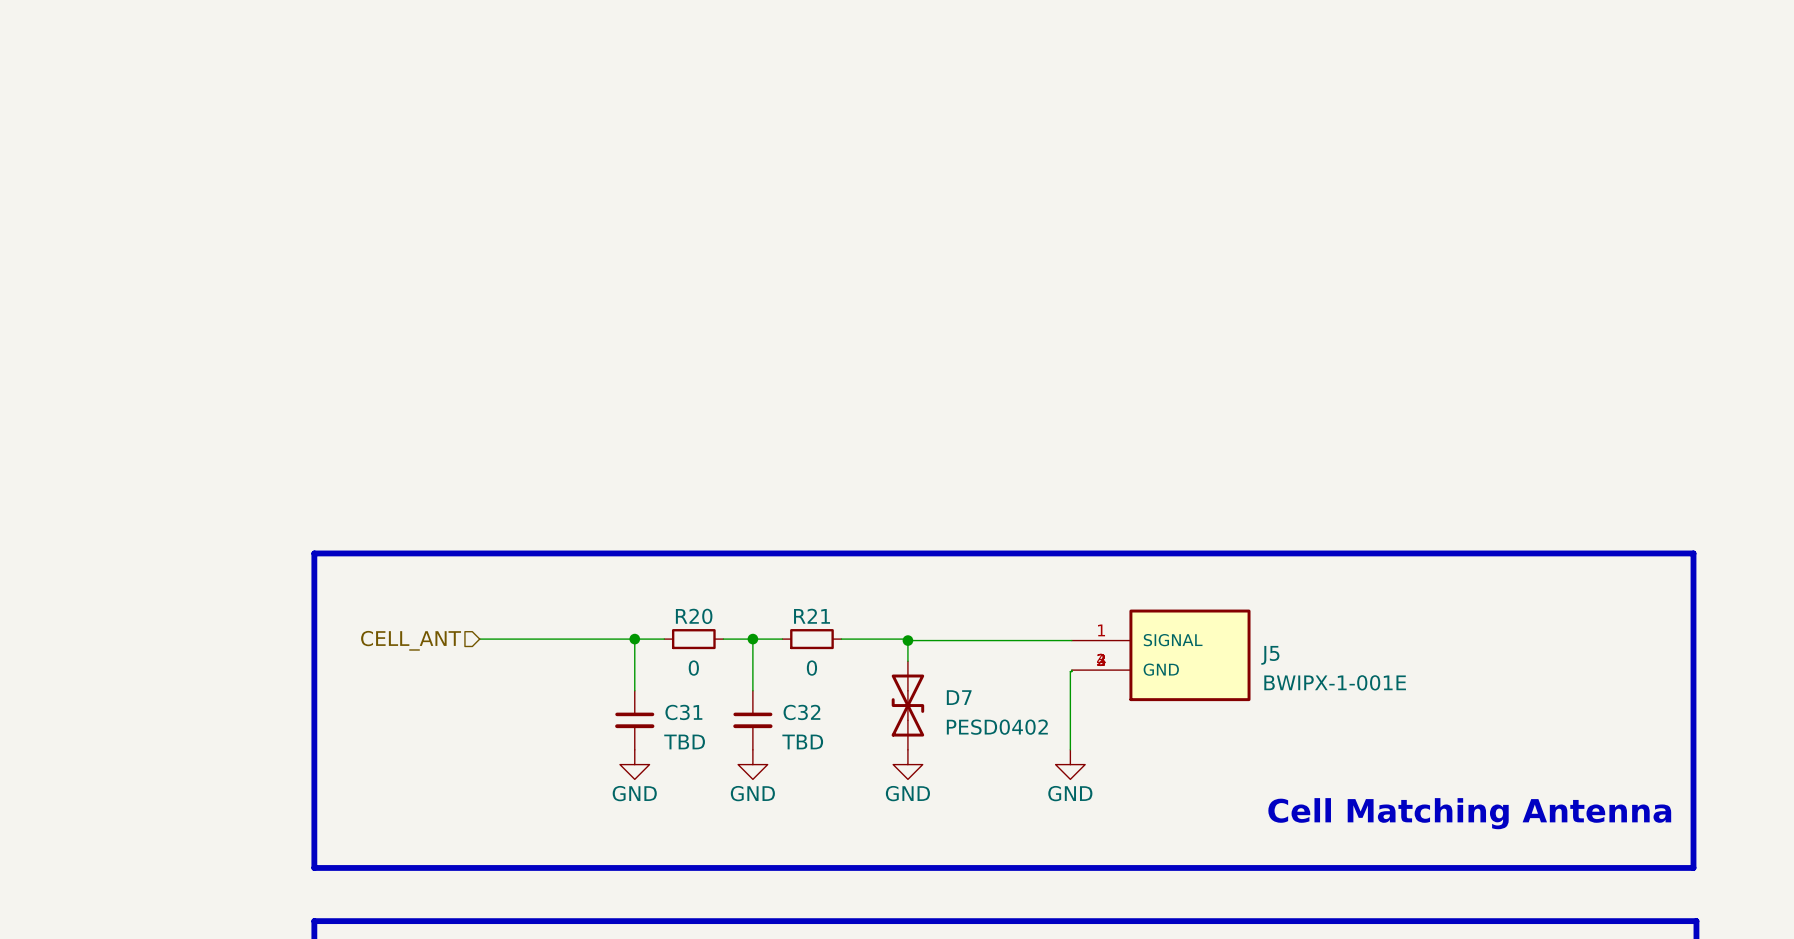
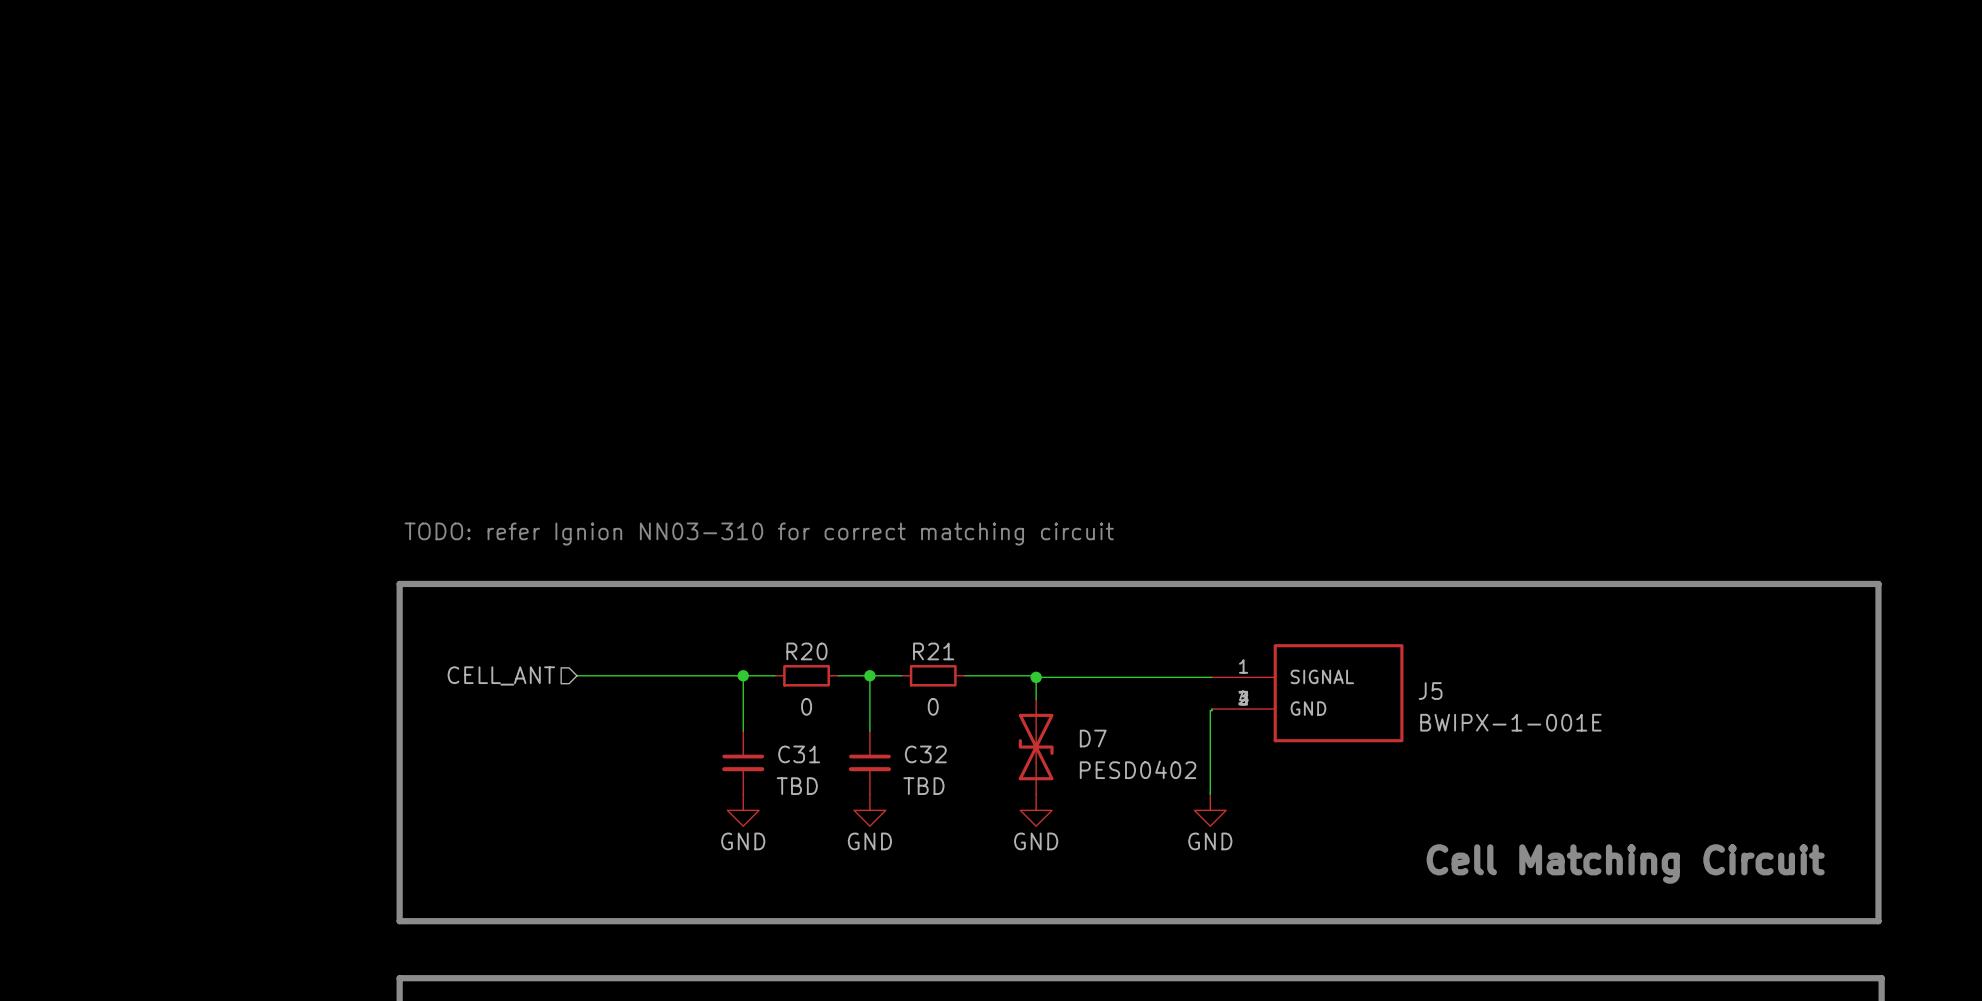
text: none -> TODO: refer Ignion NN03-310 for correct matching circuit (759, 534)
text: Cell Matching Antenna (1469, 813) -> Cell Matching Circuit (1625, 863)

